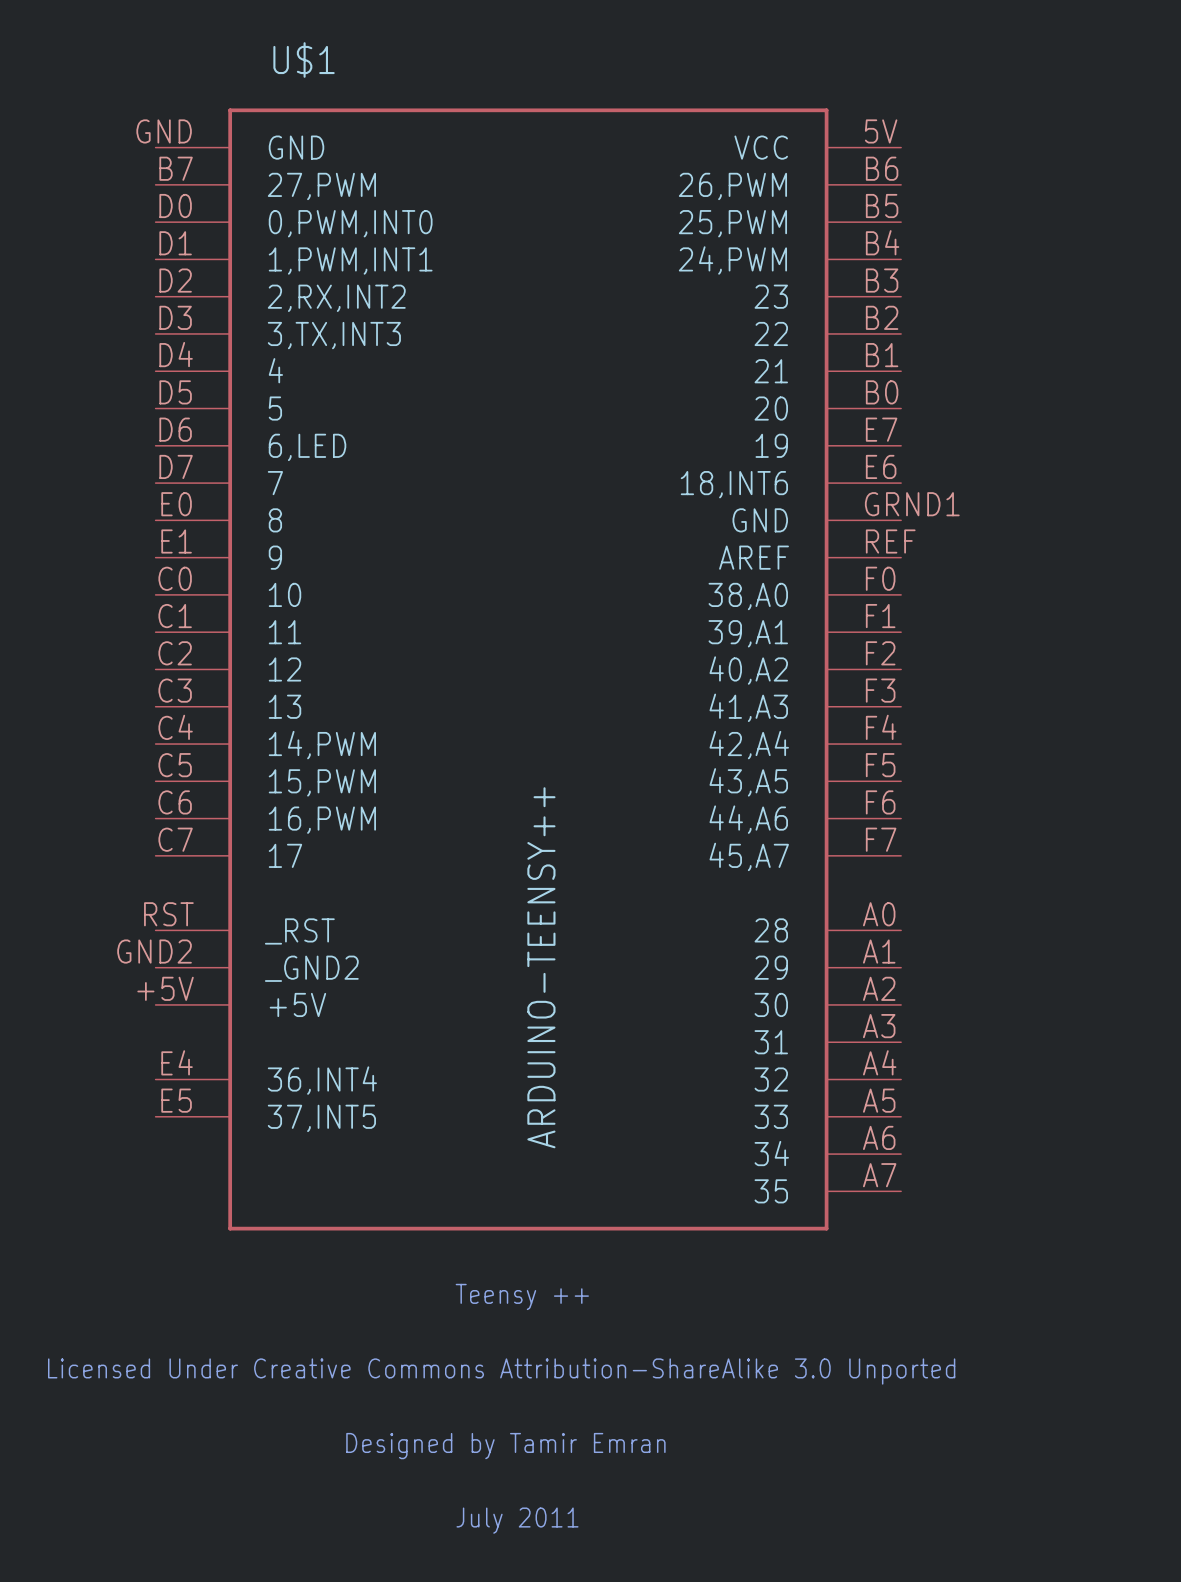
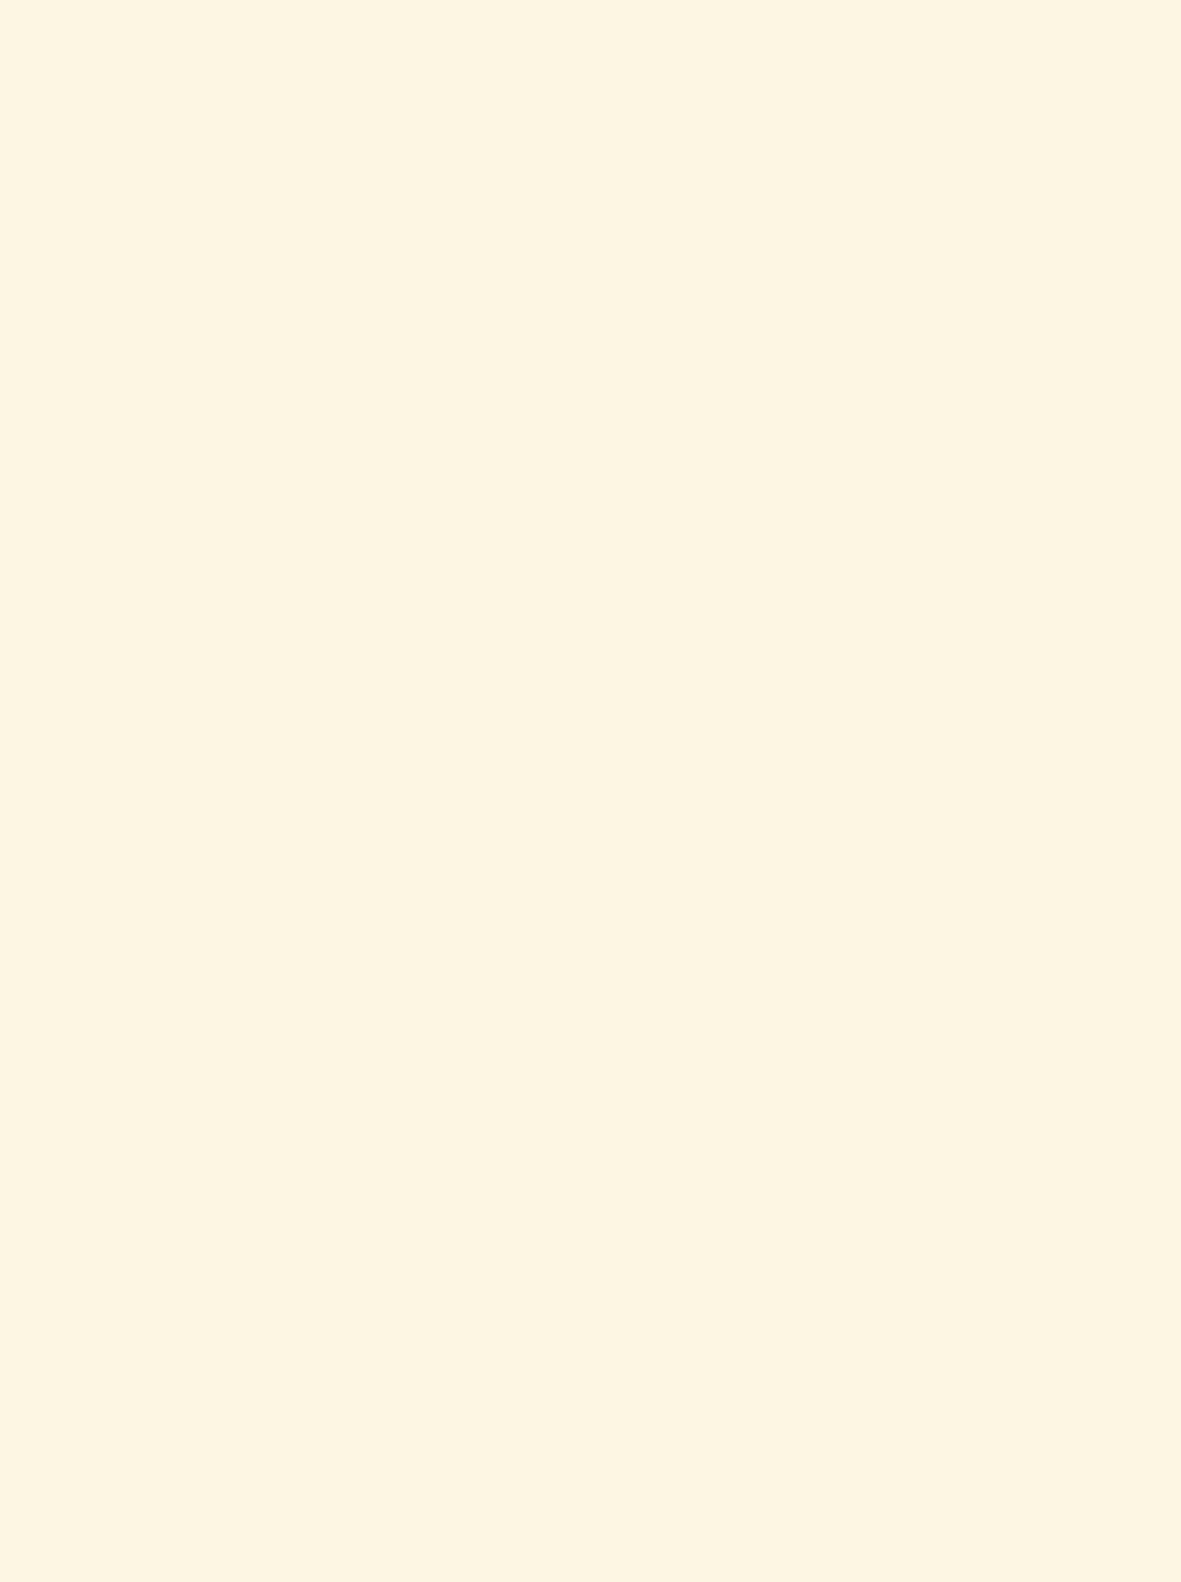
U$1: ARDUINO-TEENSY++ (528, 669) -> none

